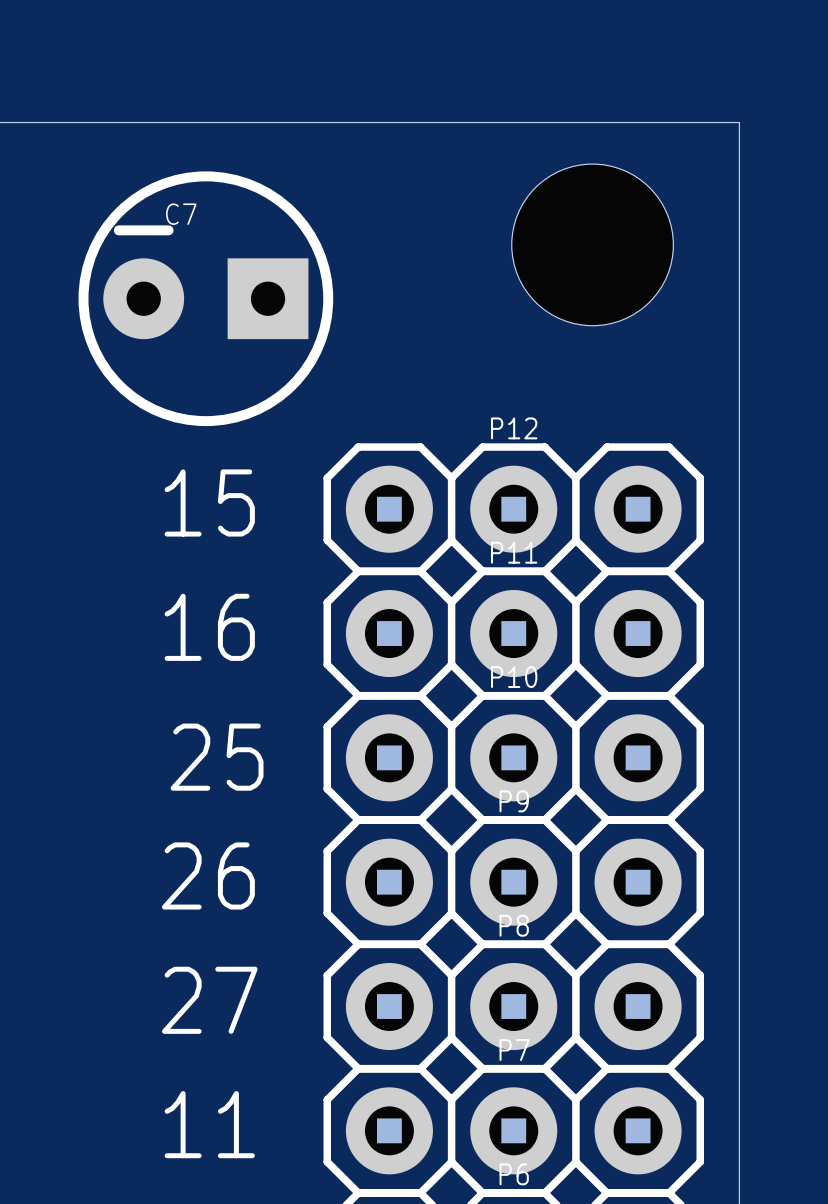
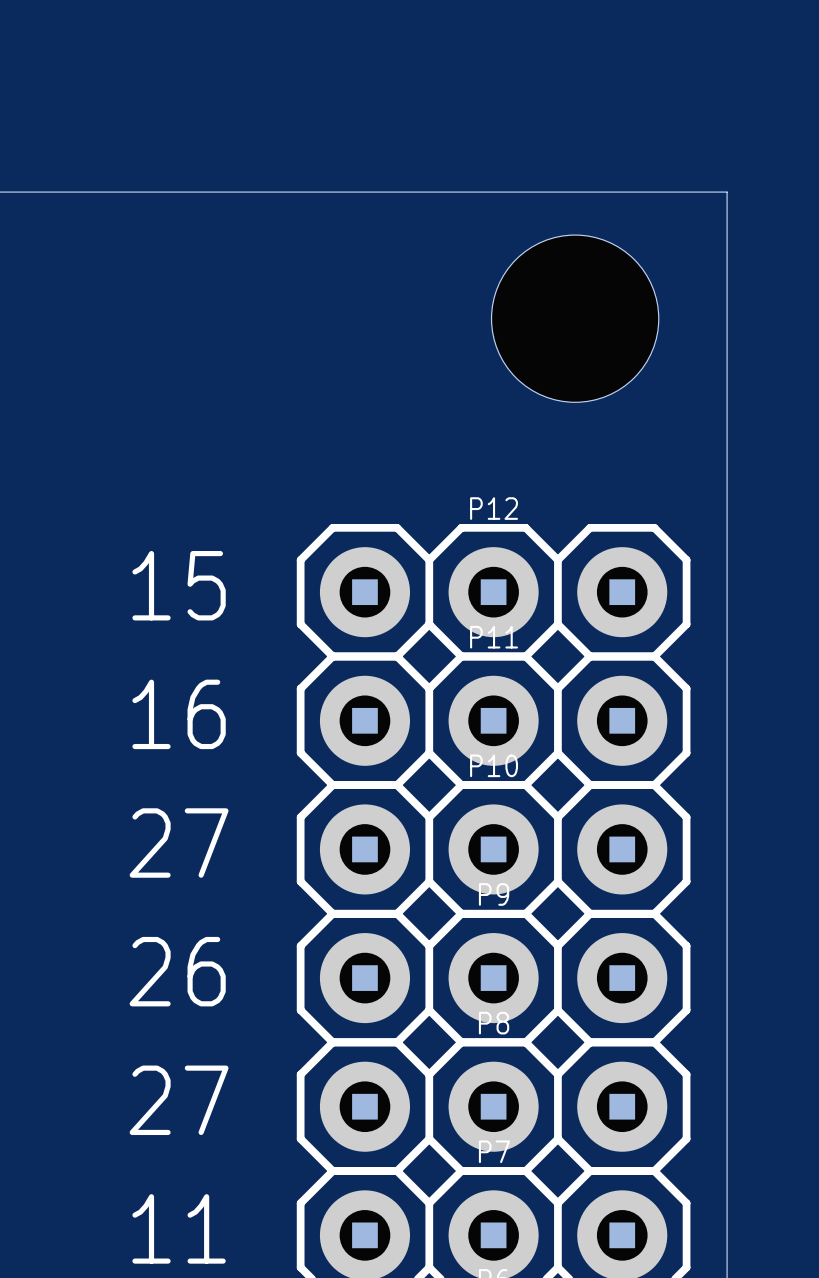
C7: (205, 298) -> none
text: 25 (217, 757) -> 27 (179, 843)

